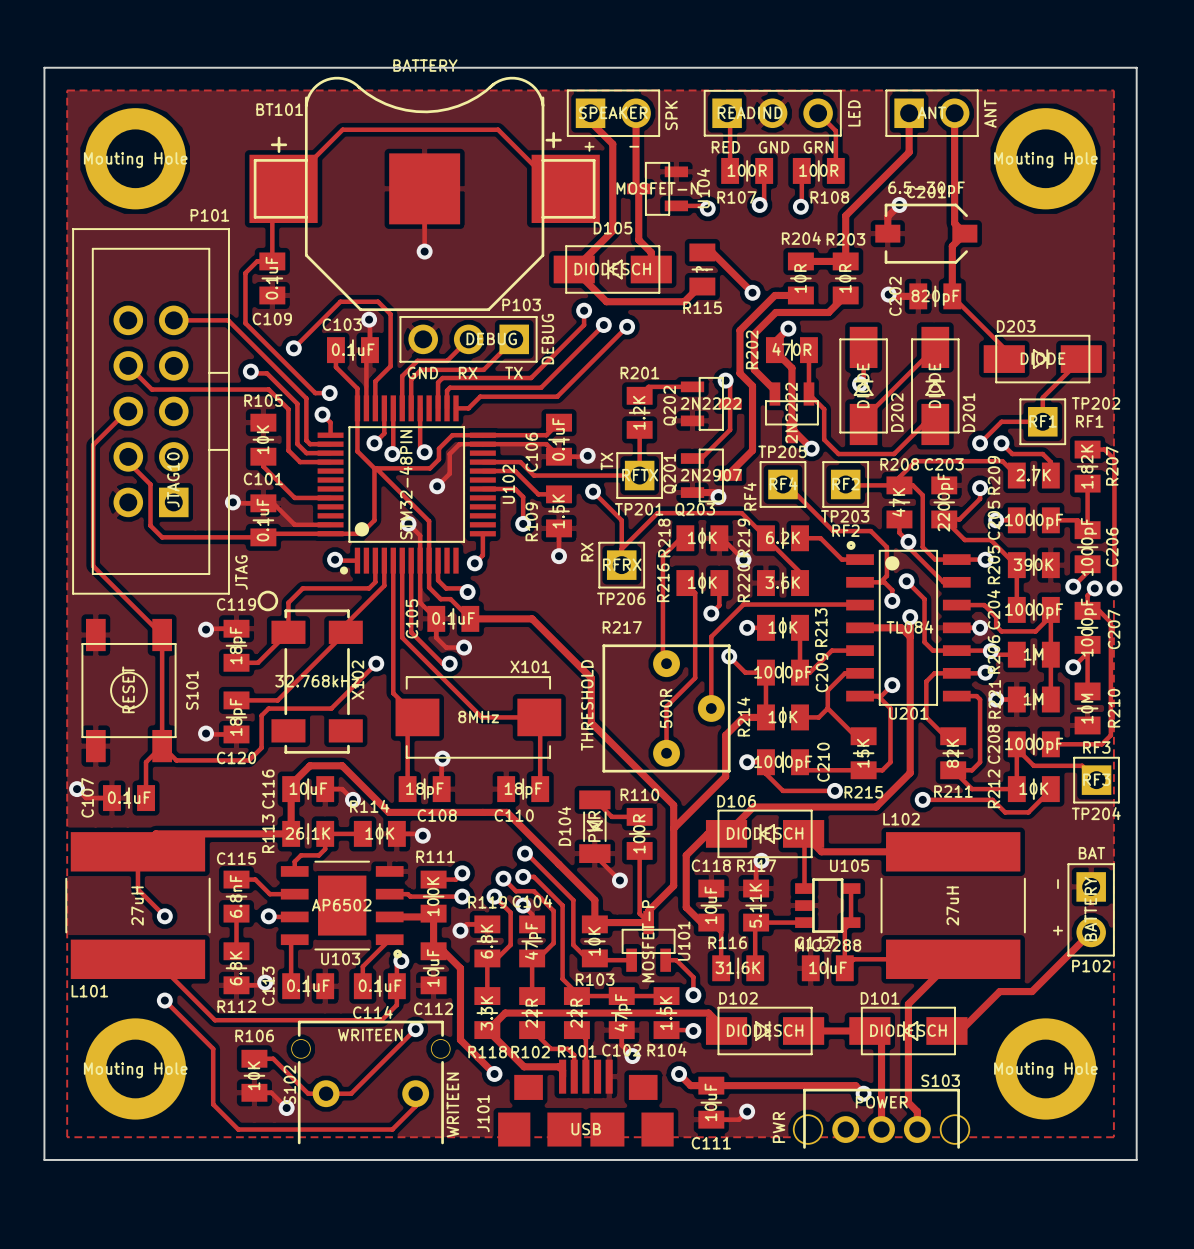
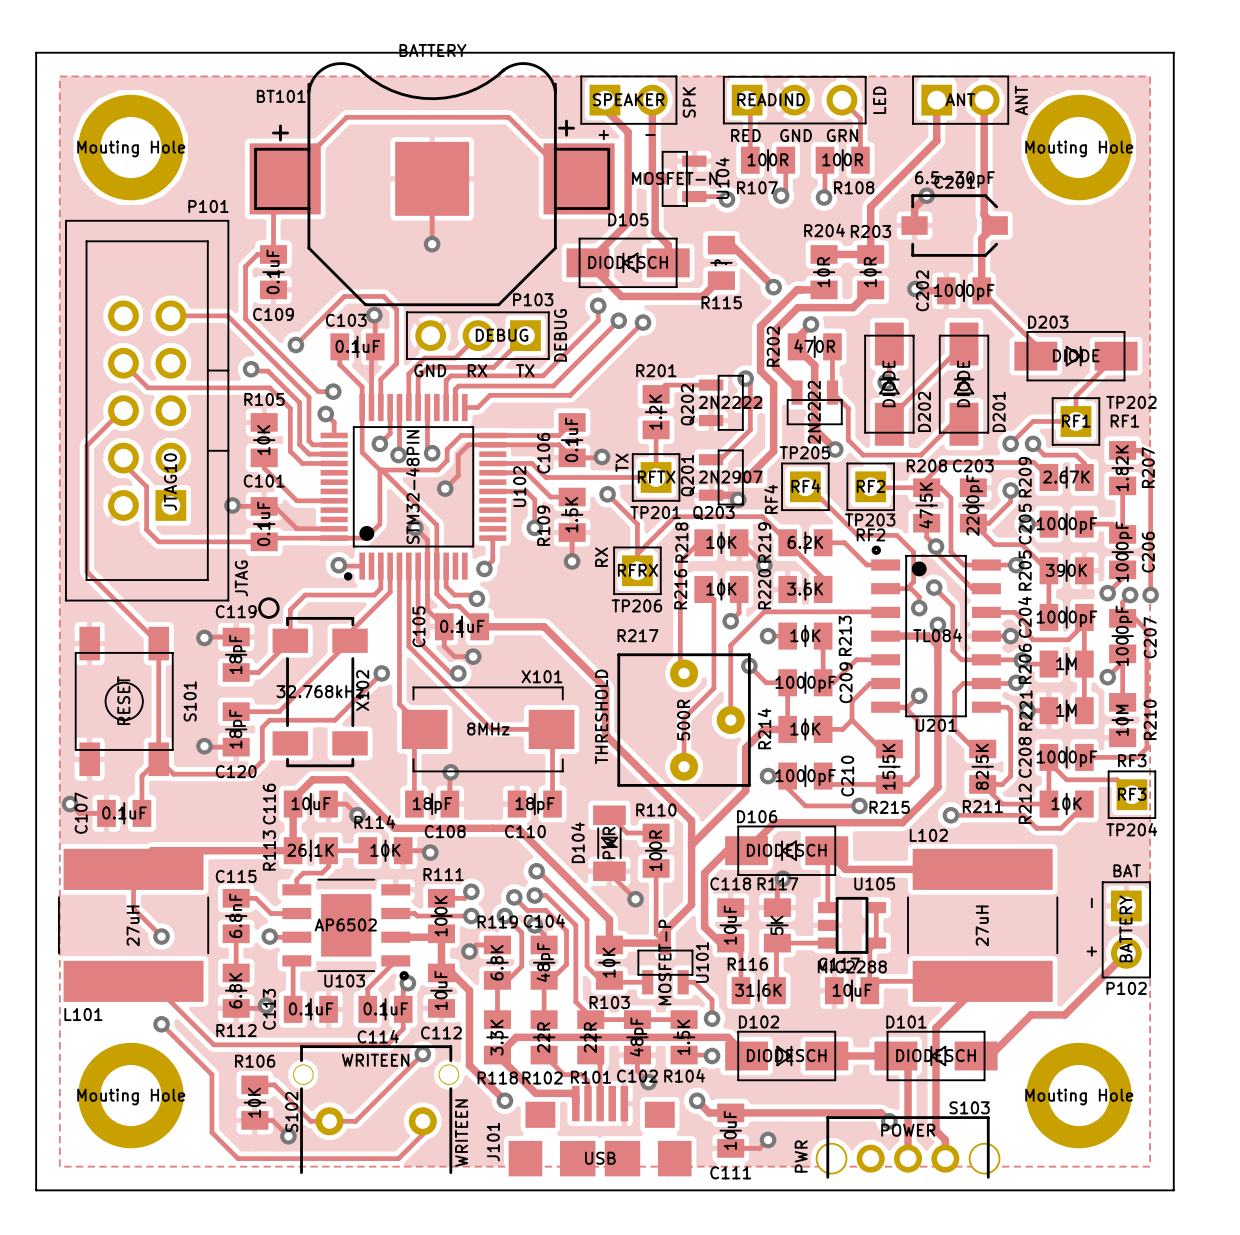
C202 value: 820pF (935, 297) -> 1000pF (964, 292)
R209 value: 2.7K (1033, 475) -> 2.67K (1066, 477)
R208 value: 47K (898, 502) -> 47.5K (926, 505)
R215 value: 15K (863, 753) -> 15.5K (888, 766)
R211 value: 82K (952, 753) -> 82.5K (982, 766)
R117 value: 5.11K (755, 905) -> 5K (776, 925)
C104 value: 47pF (533, 941) -> 48pF (545, 962)
C102 value: 47pF (622, 1012) -> 48pF (638, 1037)

